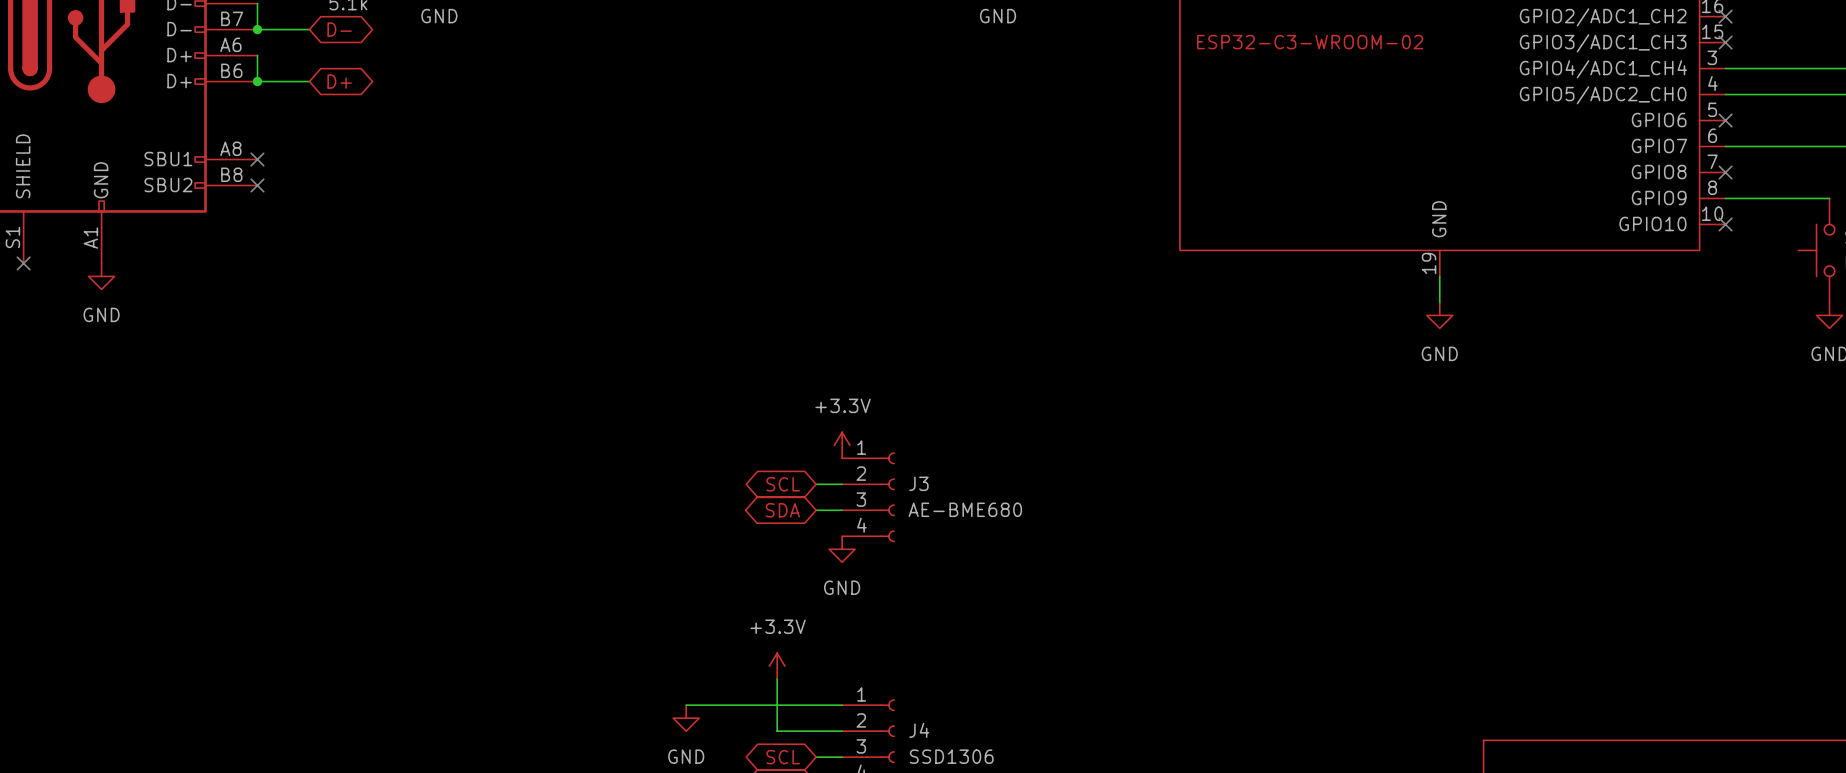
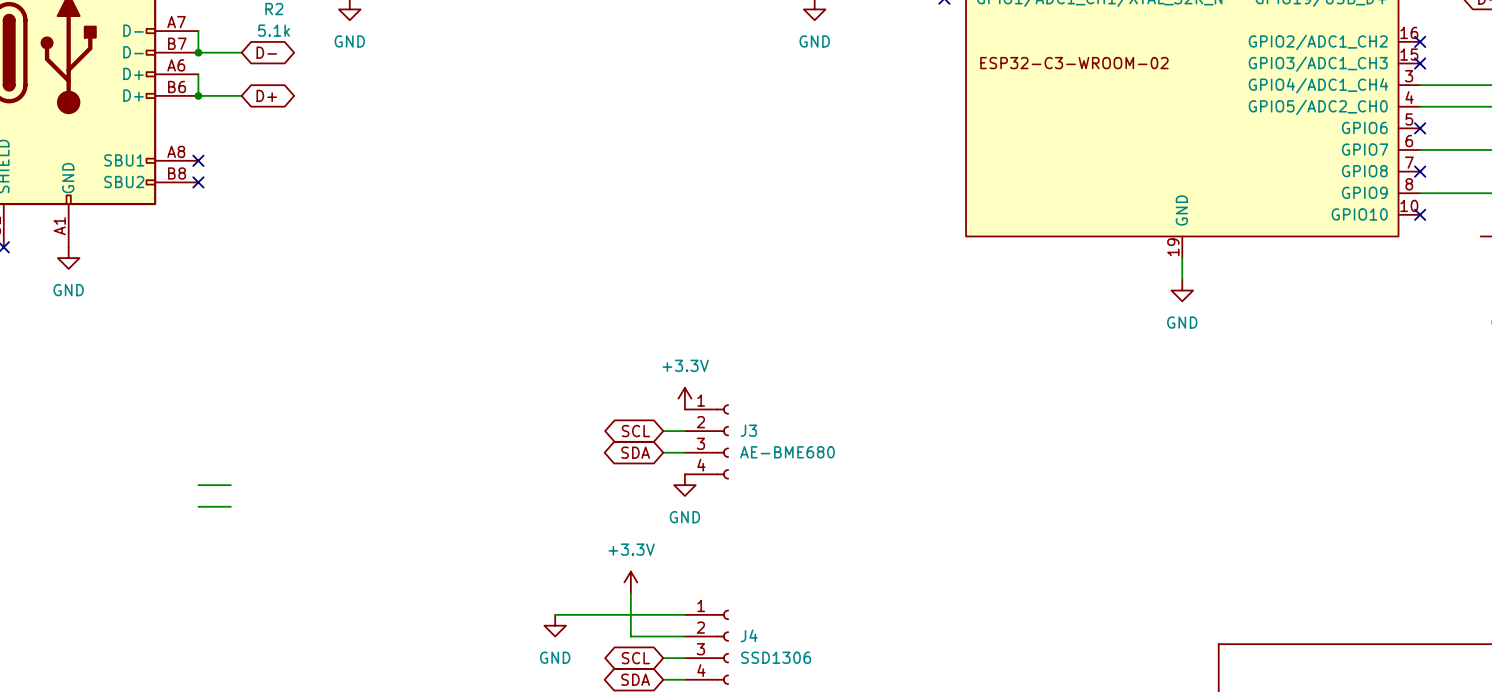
wire: none -> (198, 485) (230, 485)
wire: none -> (198, 506) (230, 506)

